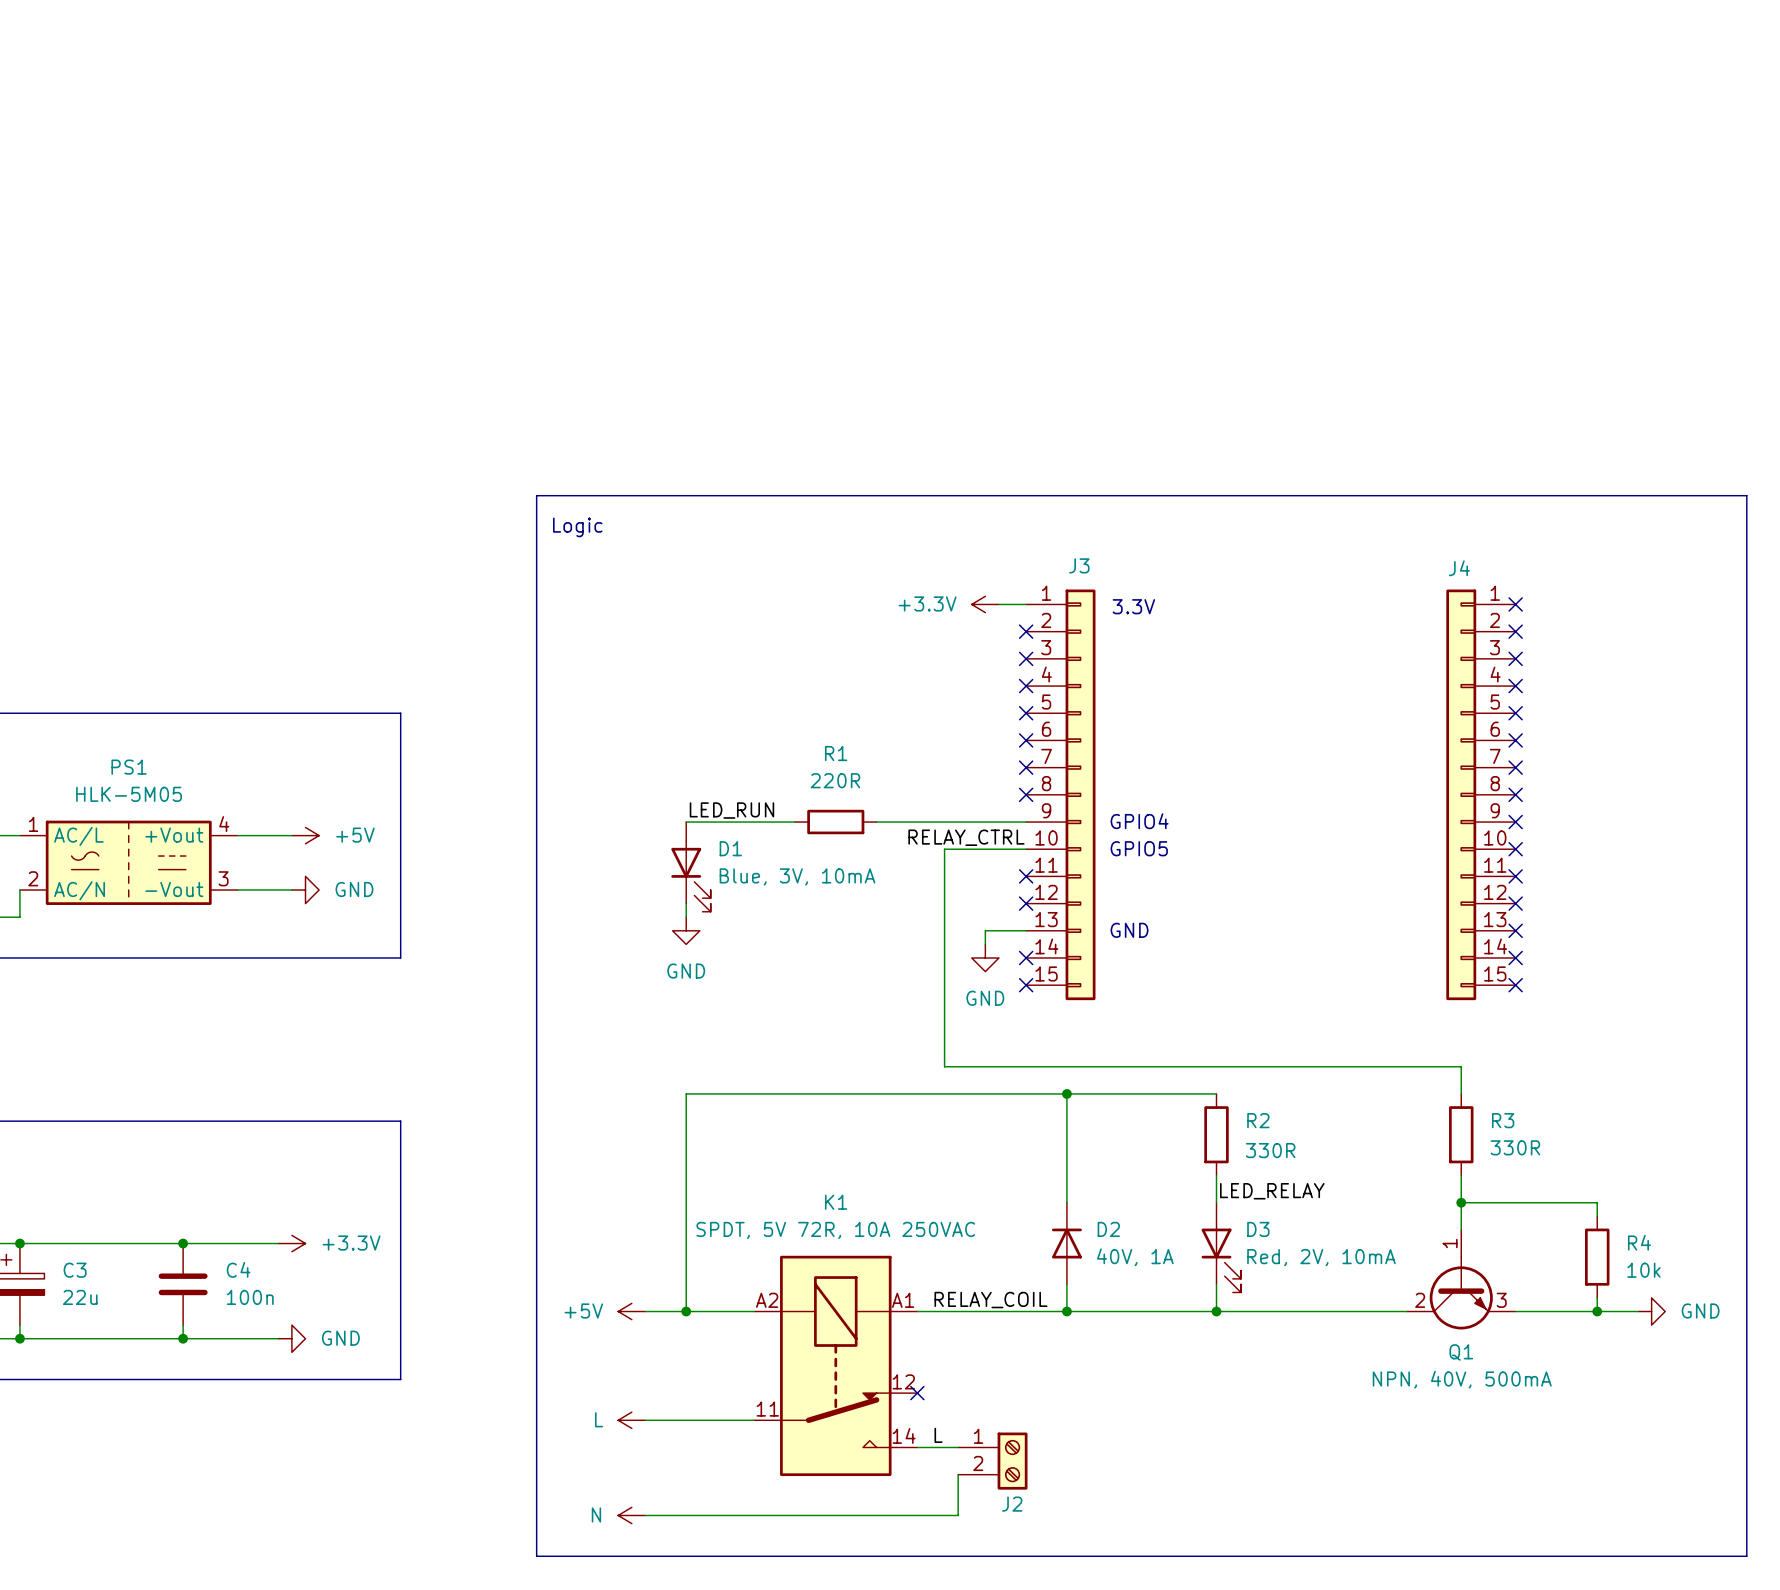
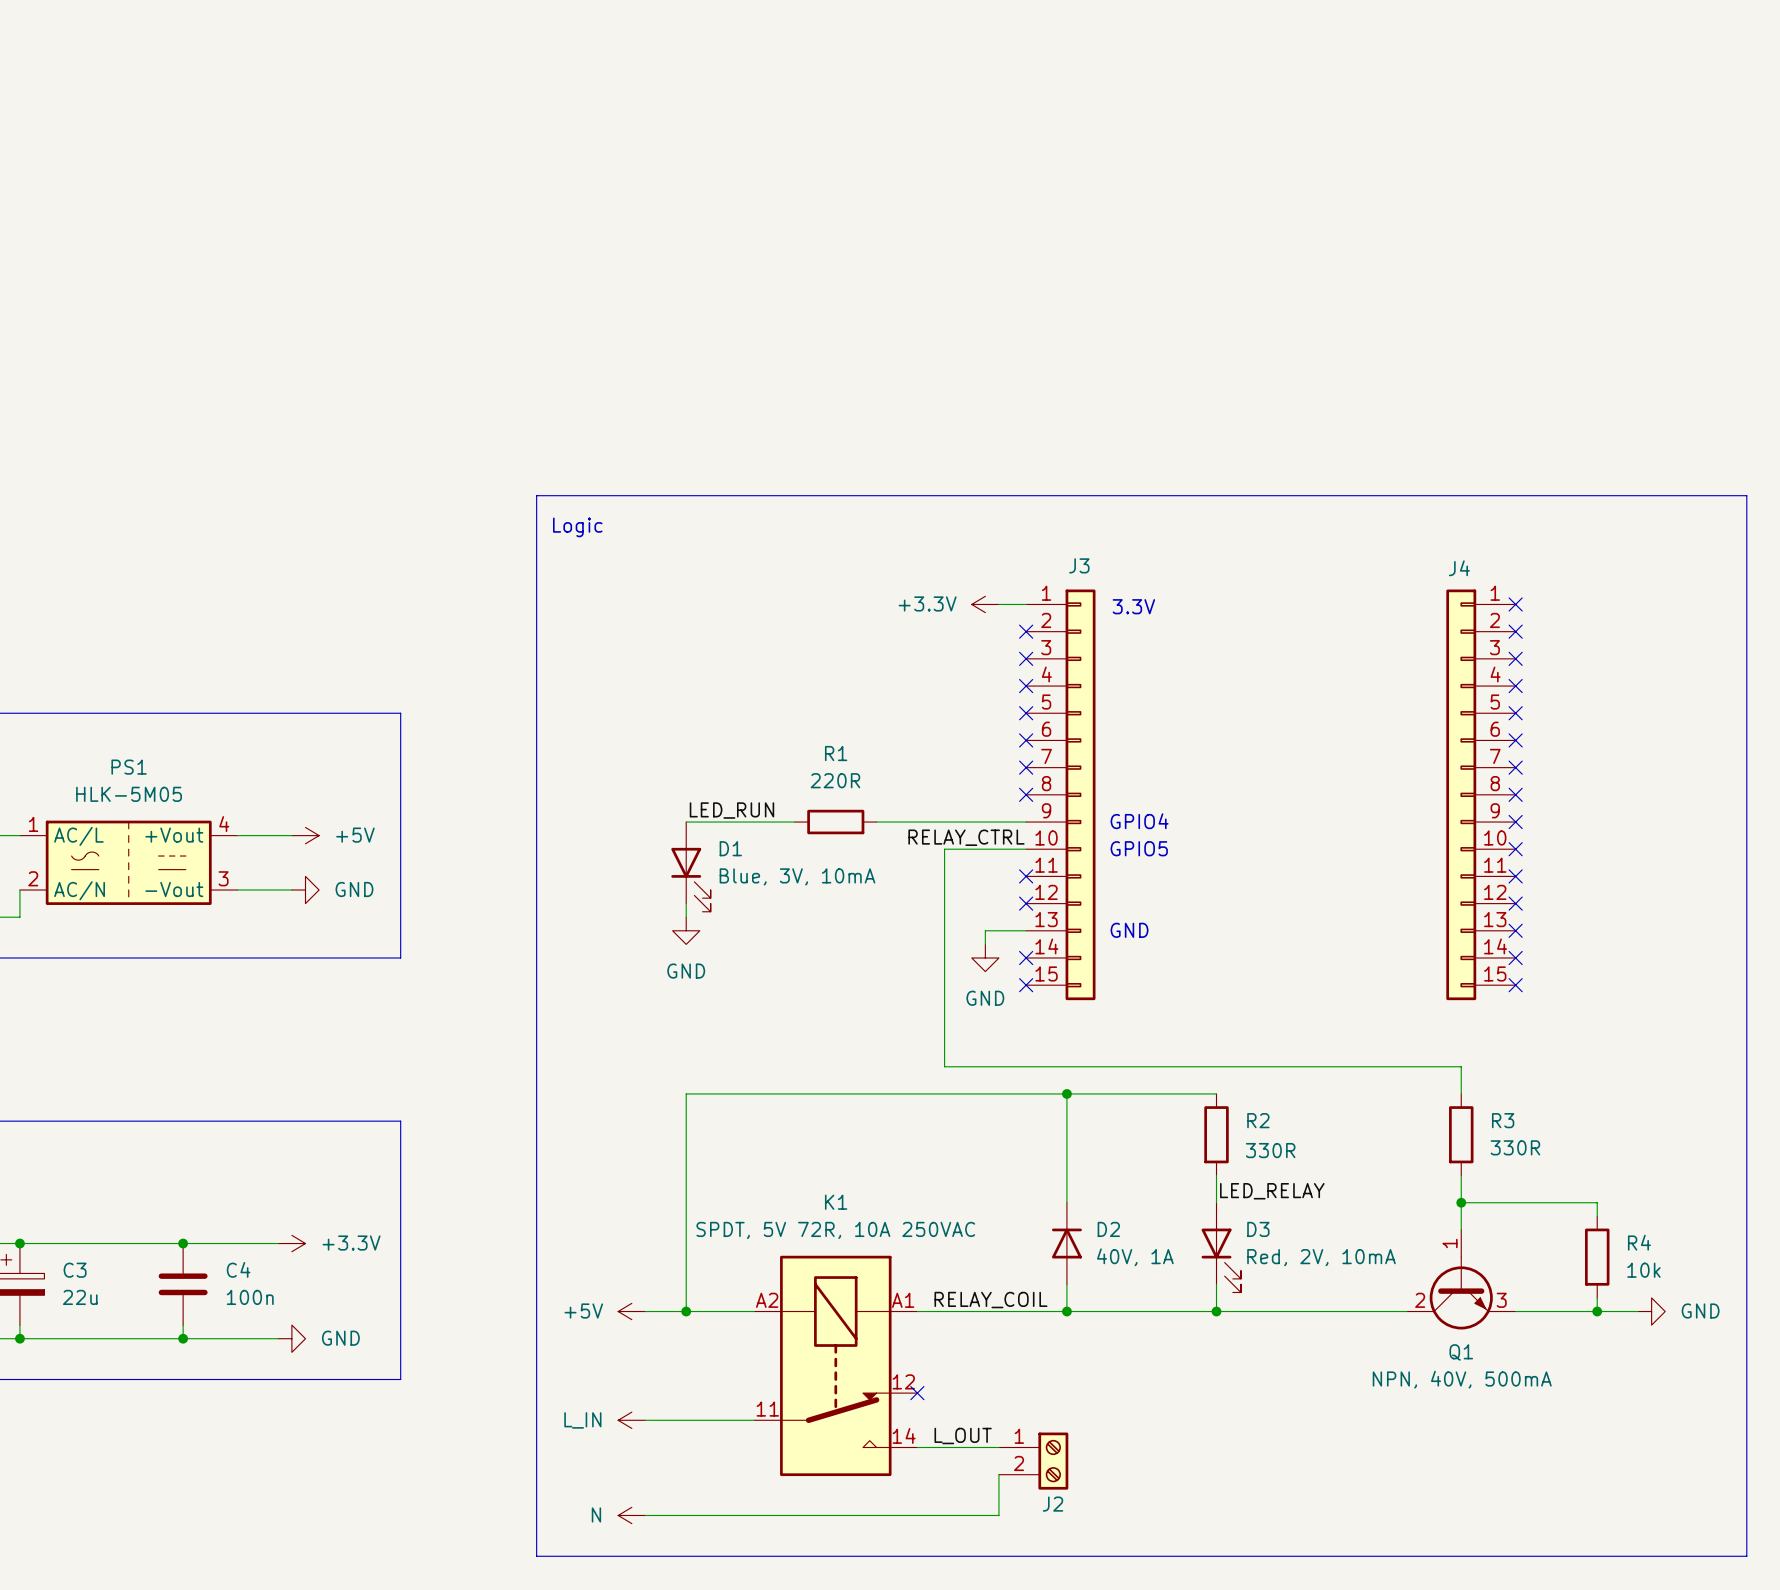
power symbol: L (631, 1420) -> L_IN (631, 1420)
label: L (938, 1435) -> L_OUT (963, 1436)
J2 position: (992, 1461) -> (1033, 1461)
wire: (958, 1474) (958, 1515) -> (998, 1474) (998, 1515) (958, 1515)

